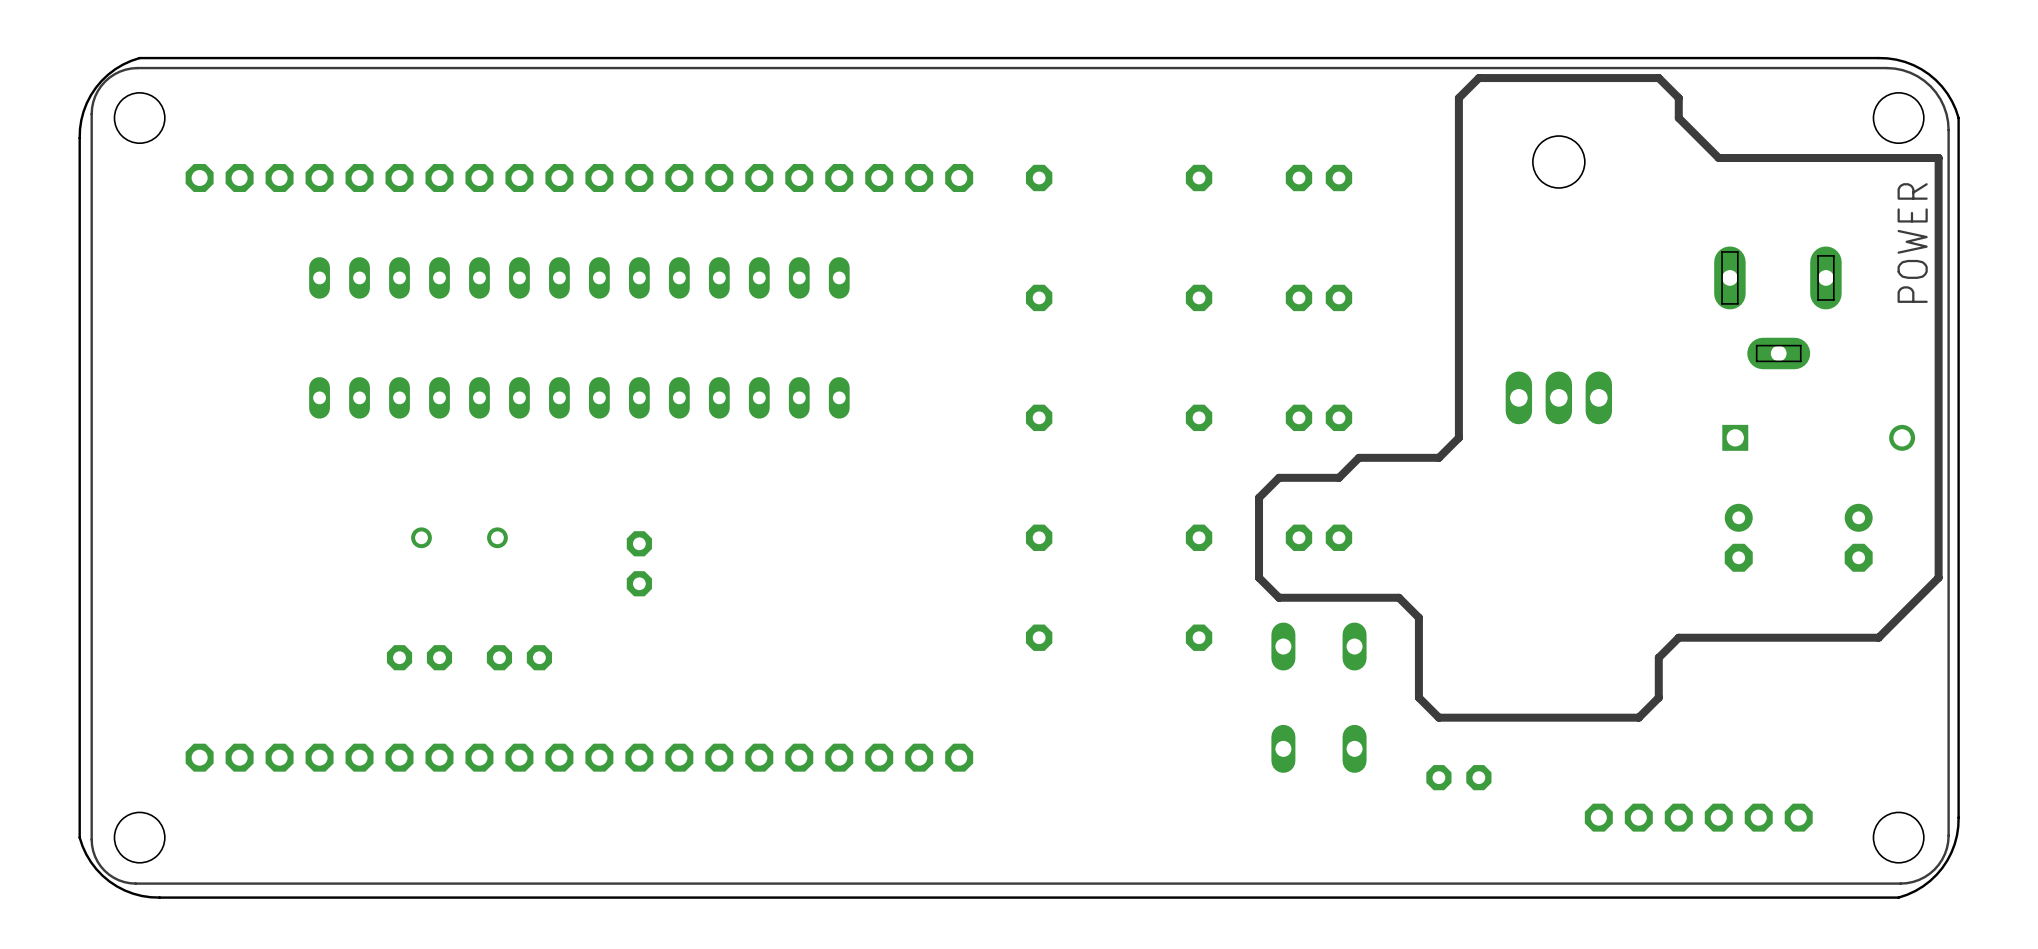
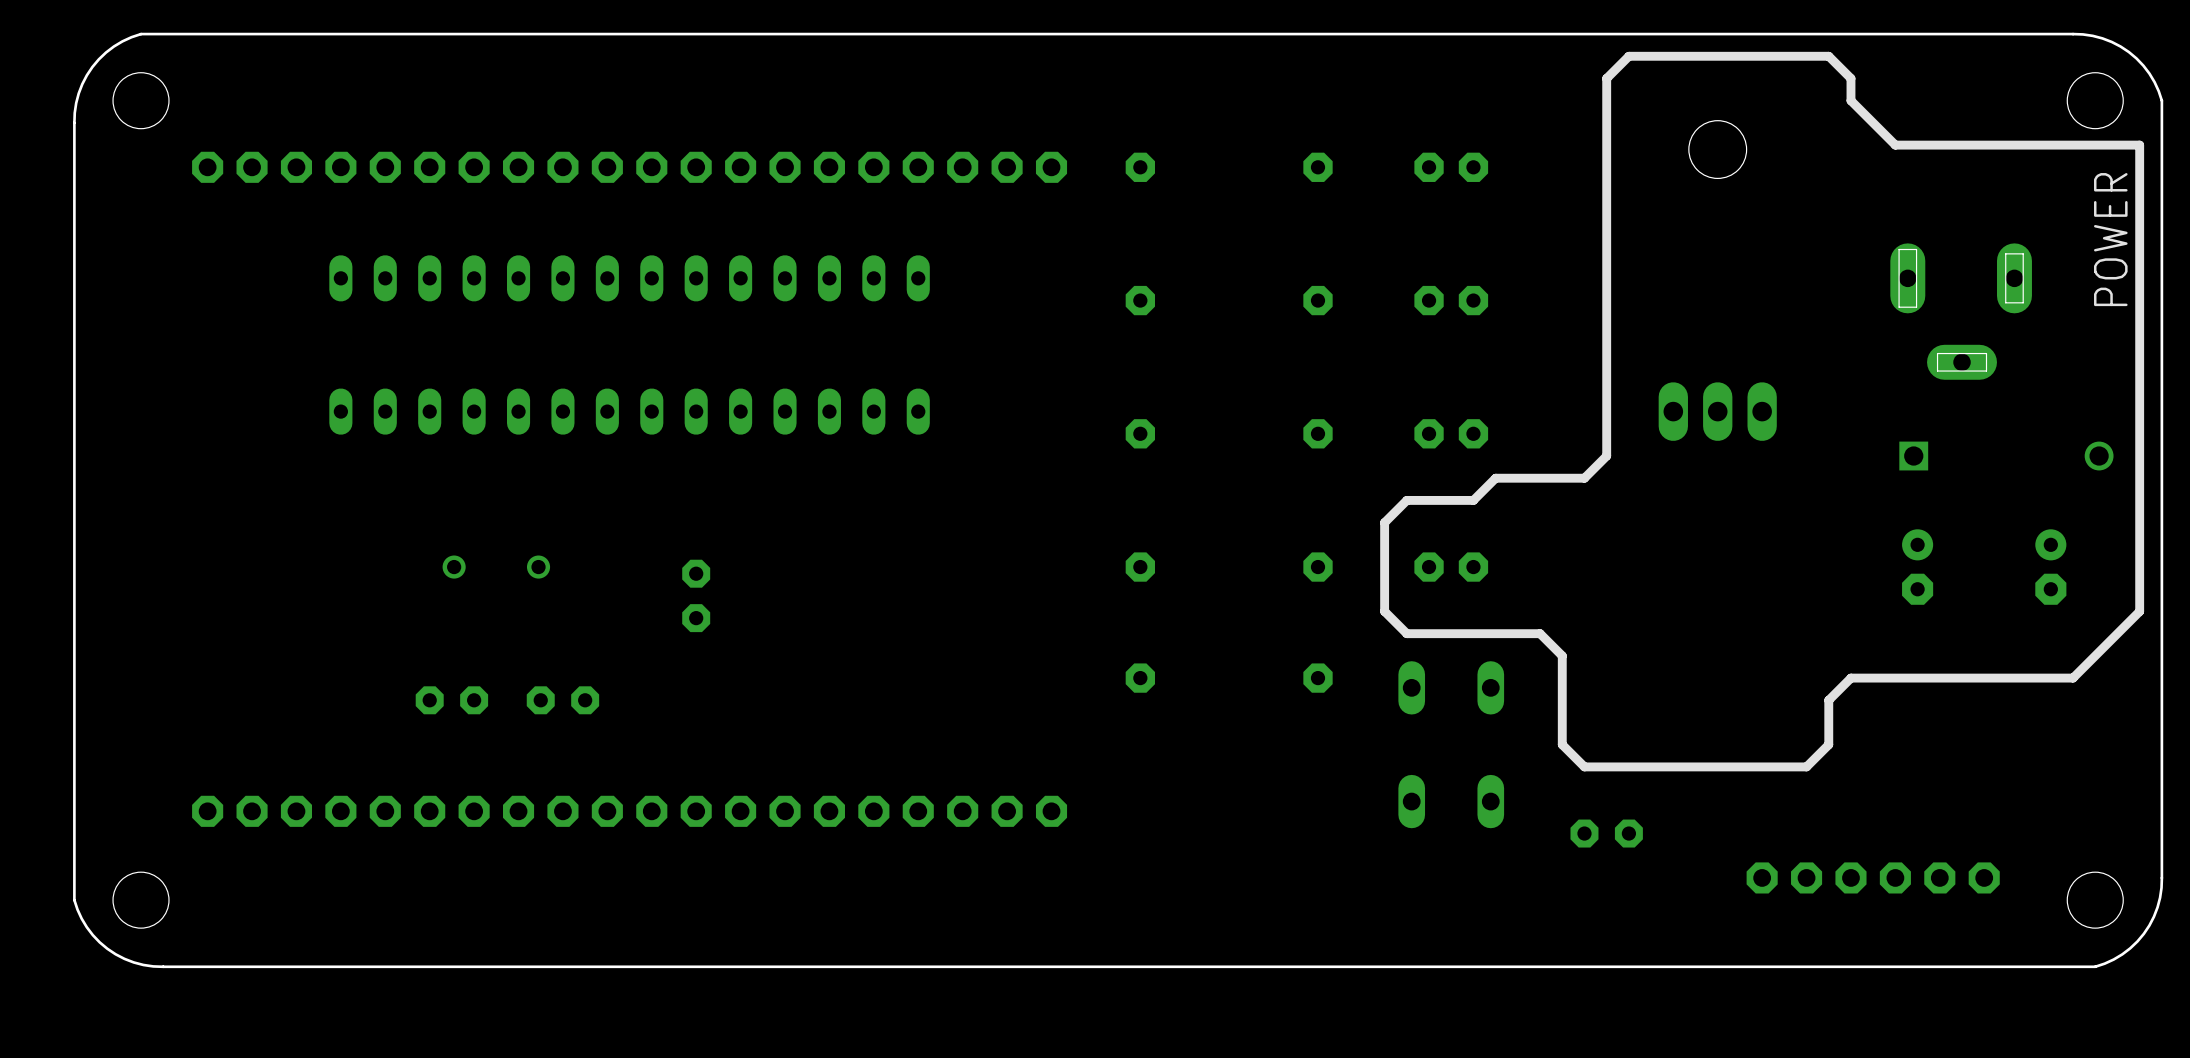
line: (1886, 68) (137, 68) (120, 71) (105, 81) (97, 91) (93, 102) (91, 114) (91, 839) (95, 856) (104, 870) (113, 877) (135, 883) (1900, 883) (1919, 879) (1929, 873) (1938, 864) (1944, 853) (1948, 835) (1948, 130) (1943, 106) (1930, 86) (1910, 72) (1886, 68) -> none

